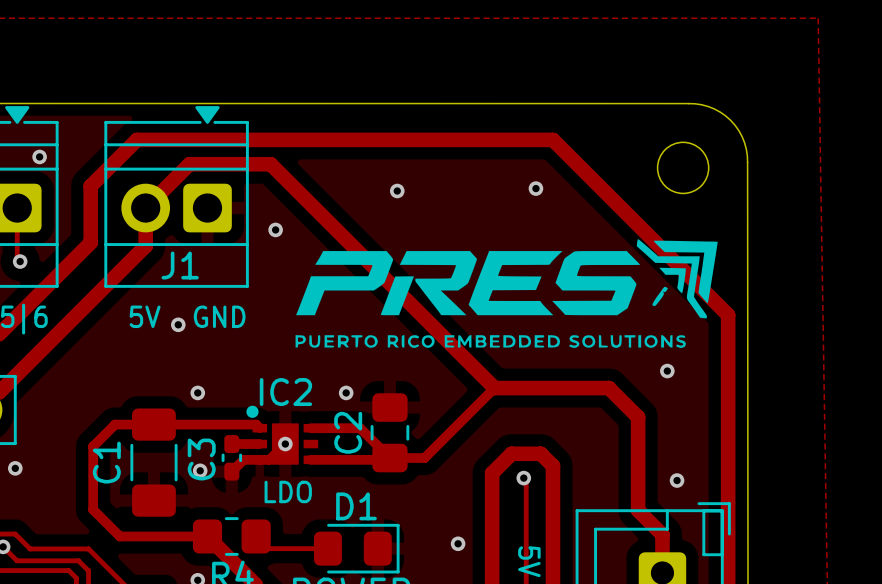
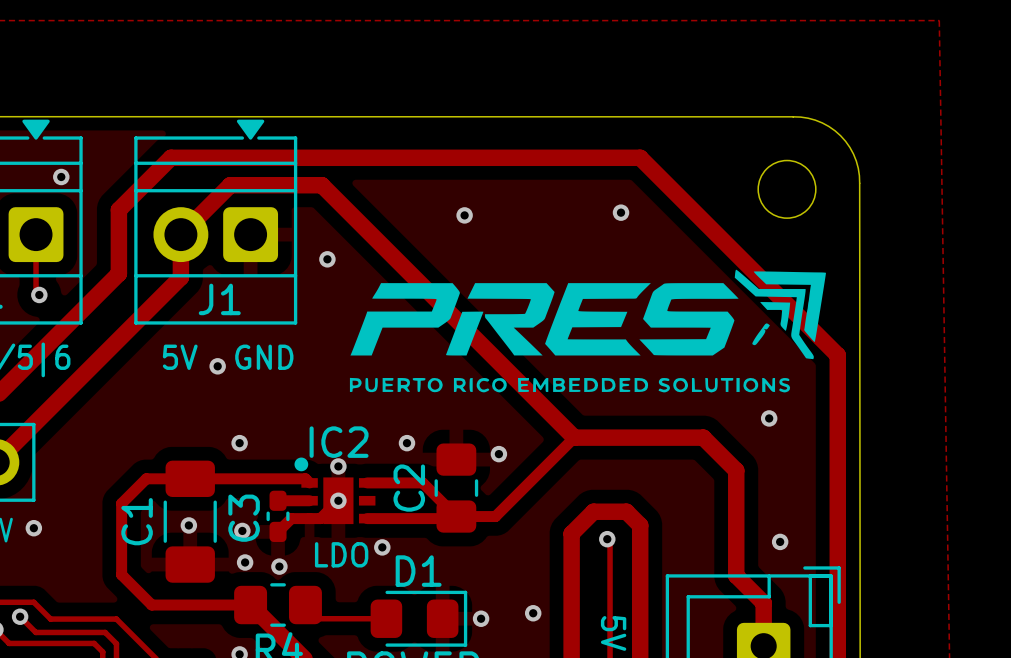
via: none -> (498, 454)
via: none -> (338, 466)
via: none -> (188, 525)
via: none -> (382, 547)
via: none -> (245, 562)
via: none -> (279, 566)
via: none -> (481, 618)

